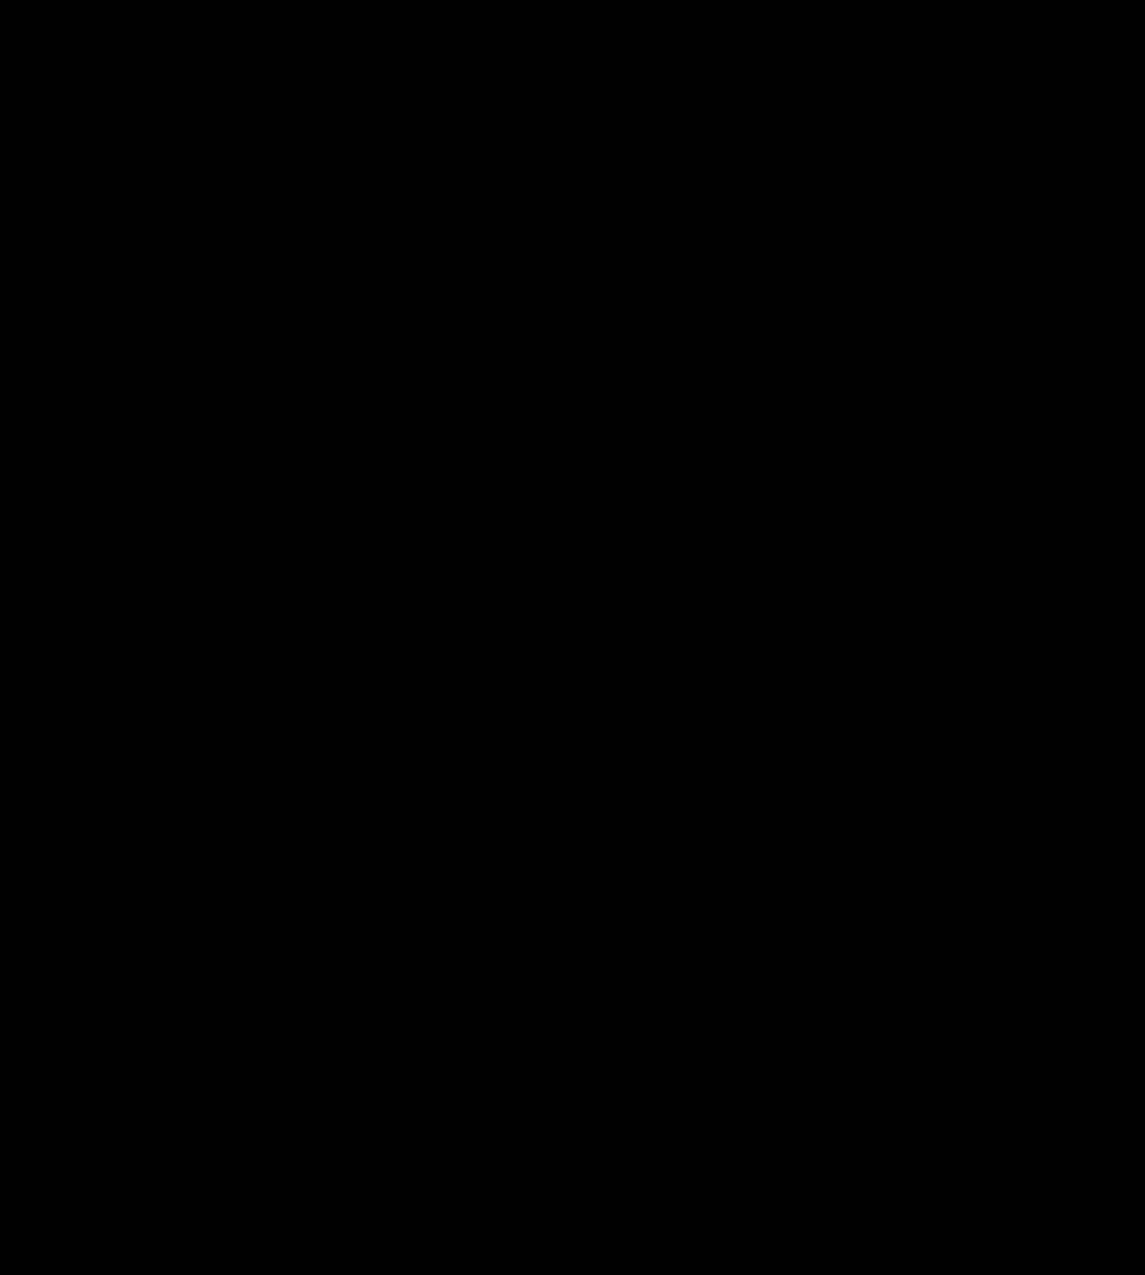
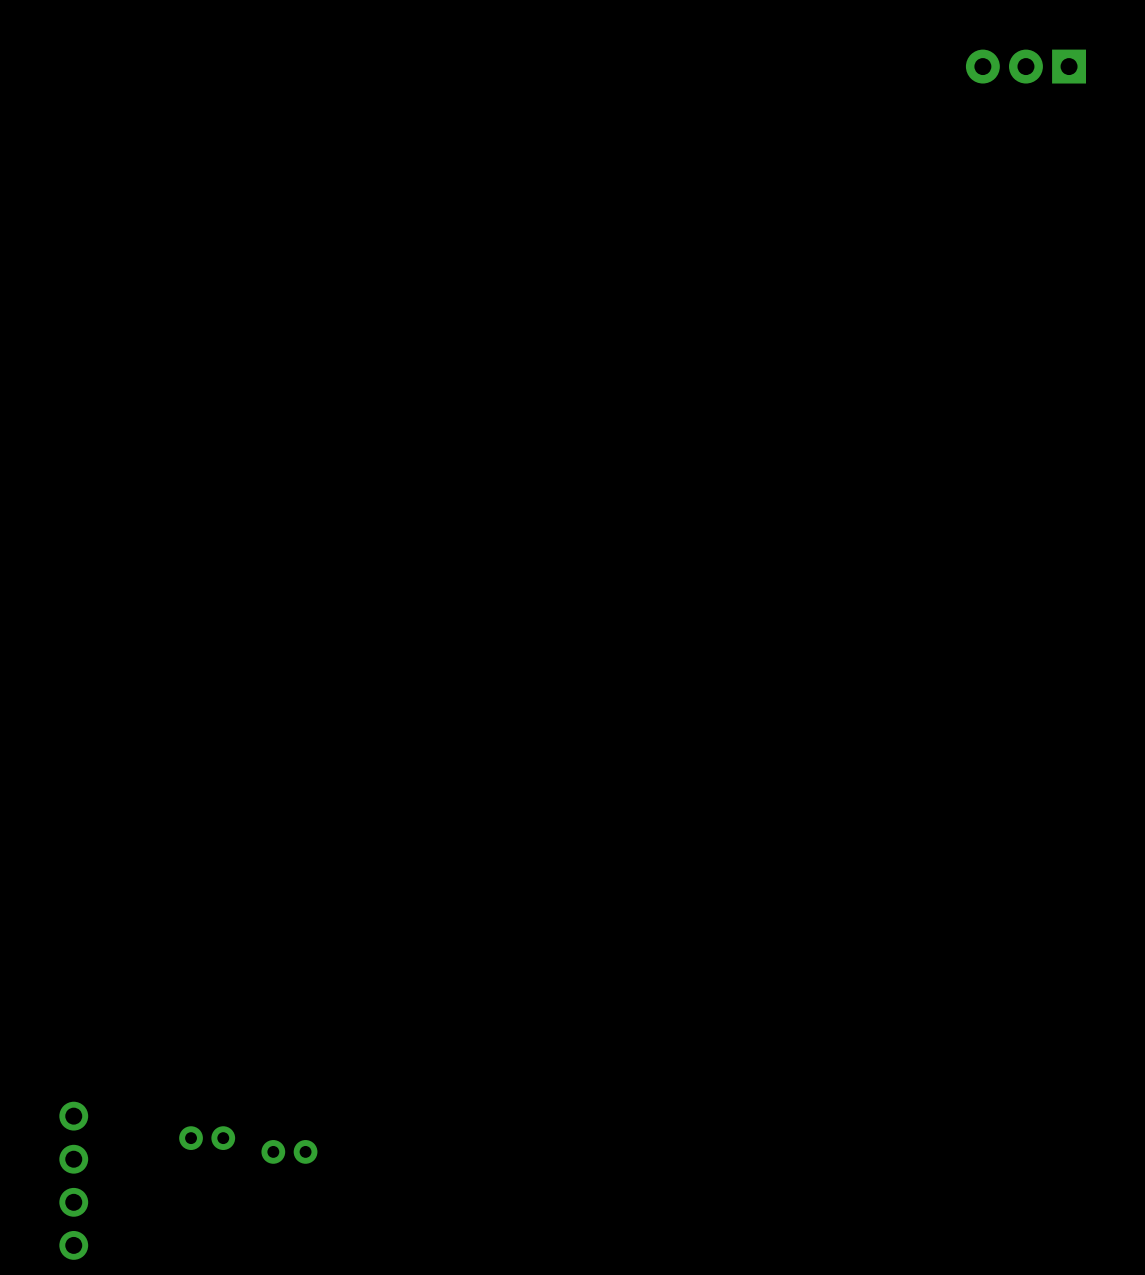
part: none -> (1025, 66)
part: none -> (207, 1138)
part: none -> (289, 1151)
part: none -> (73, 1180)

